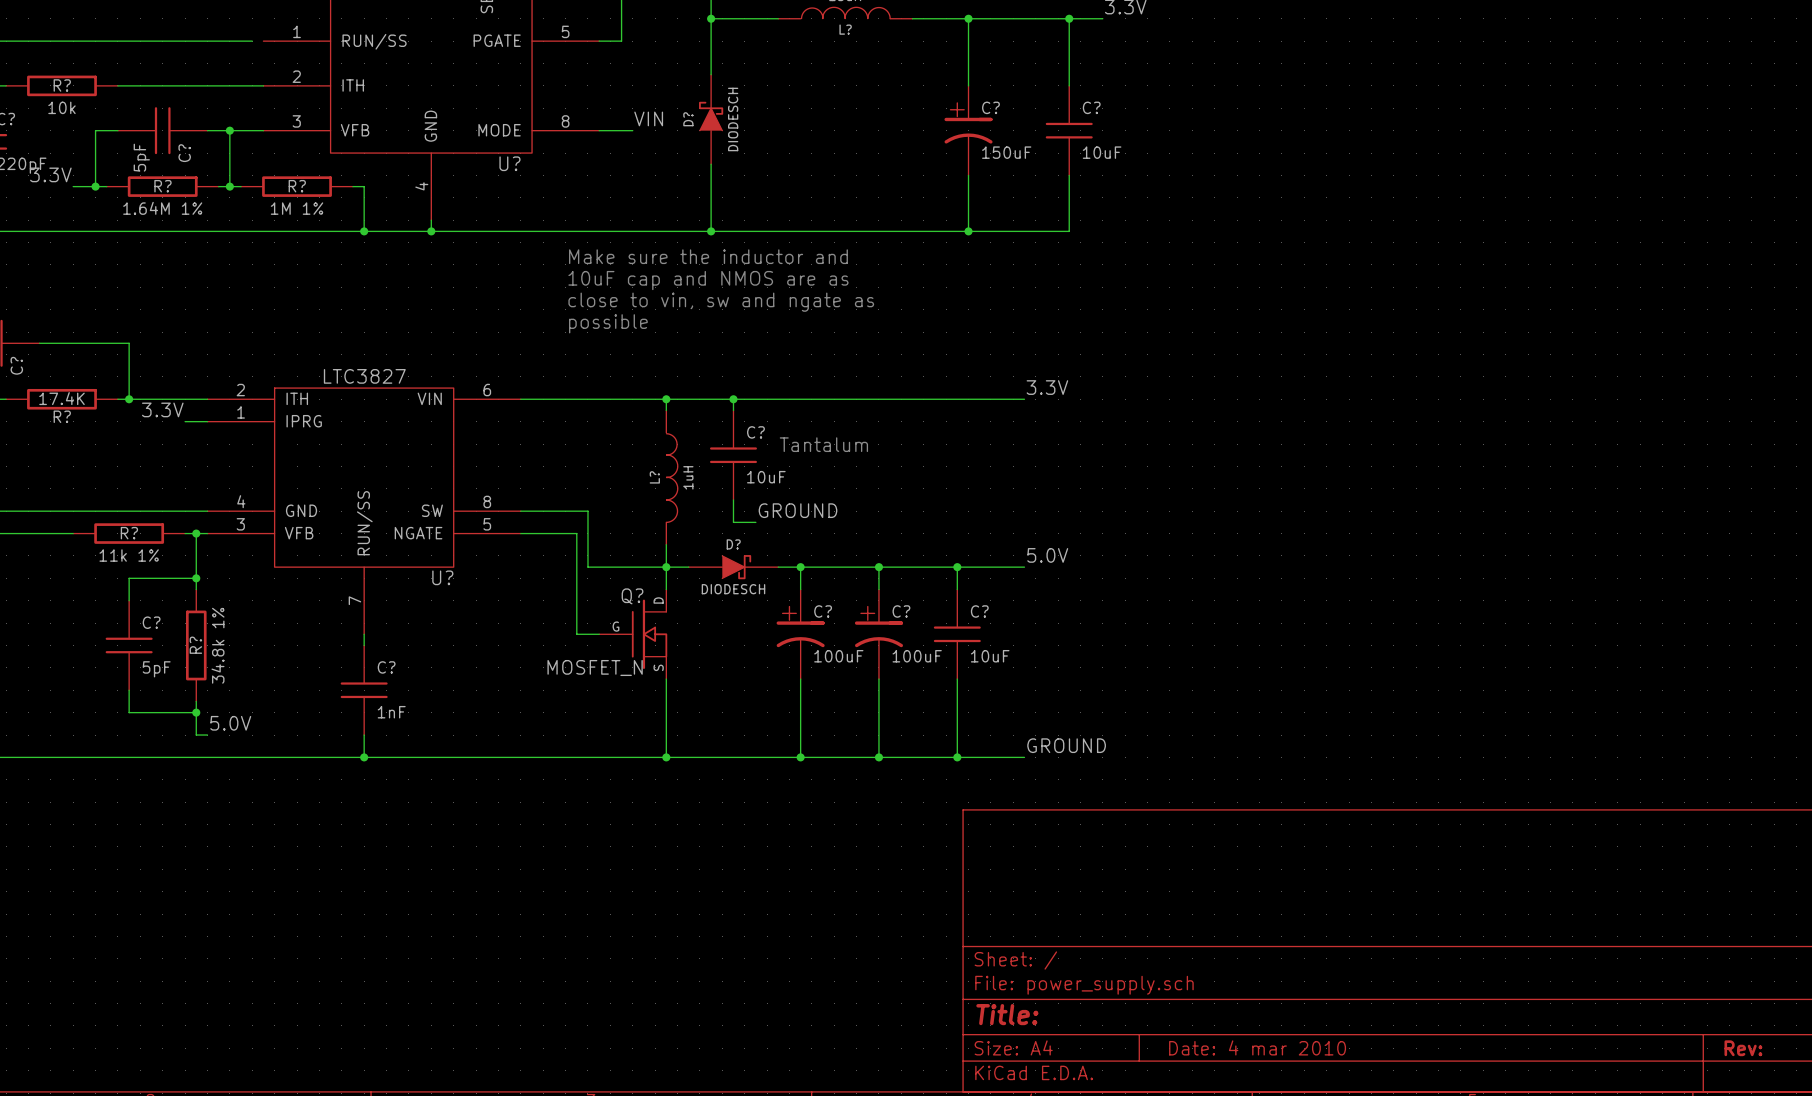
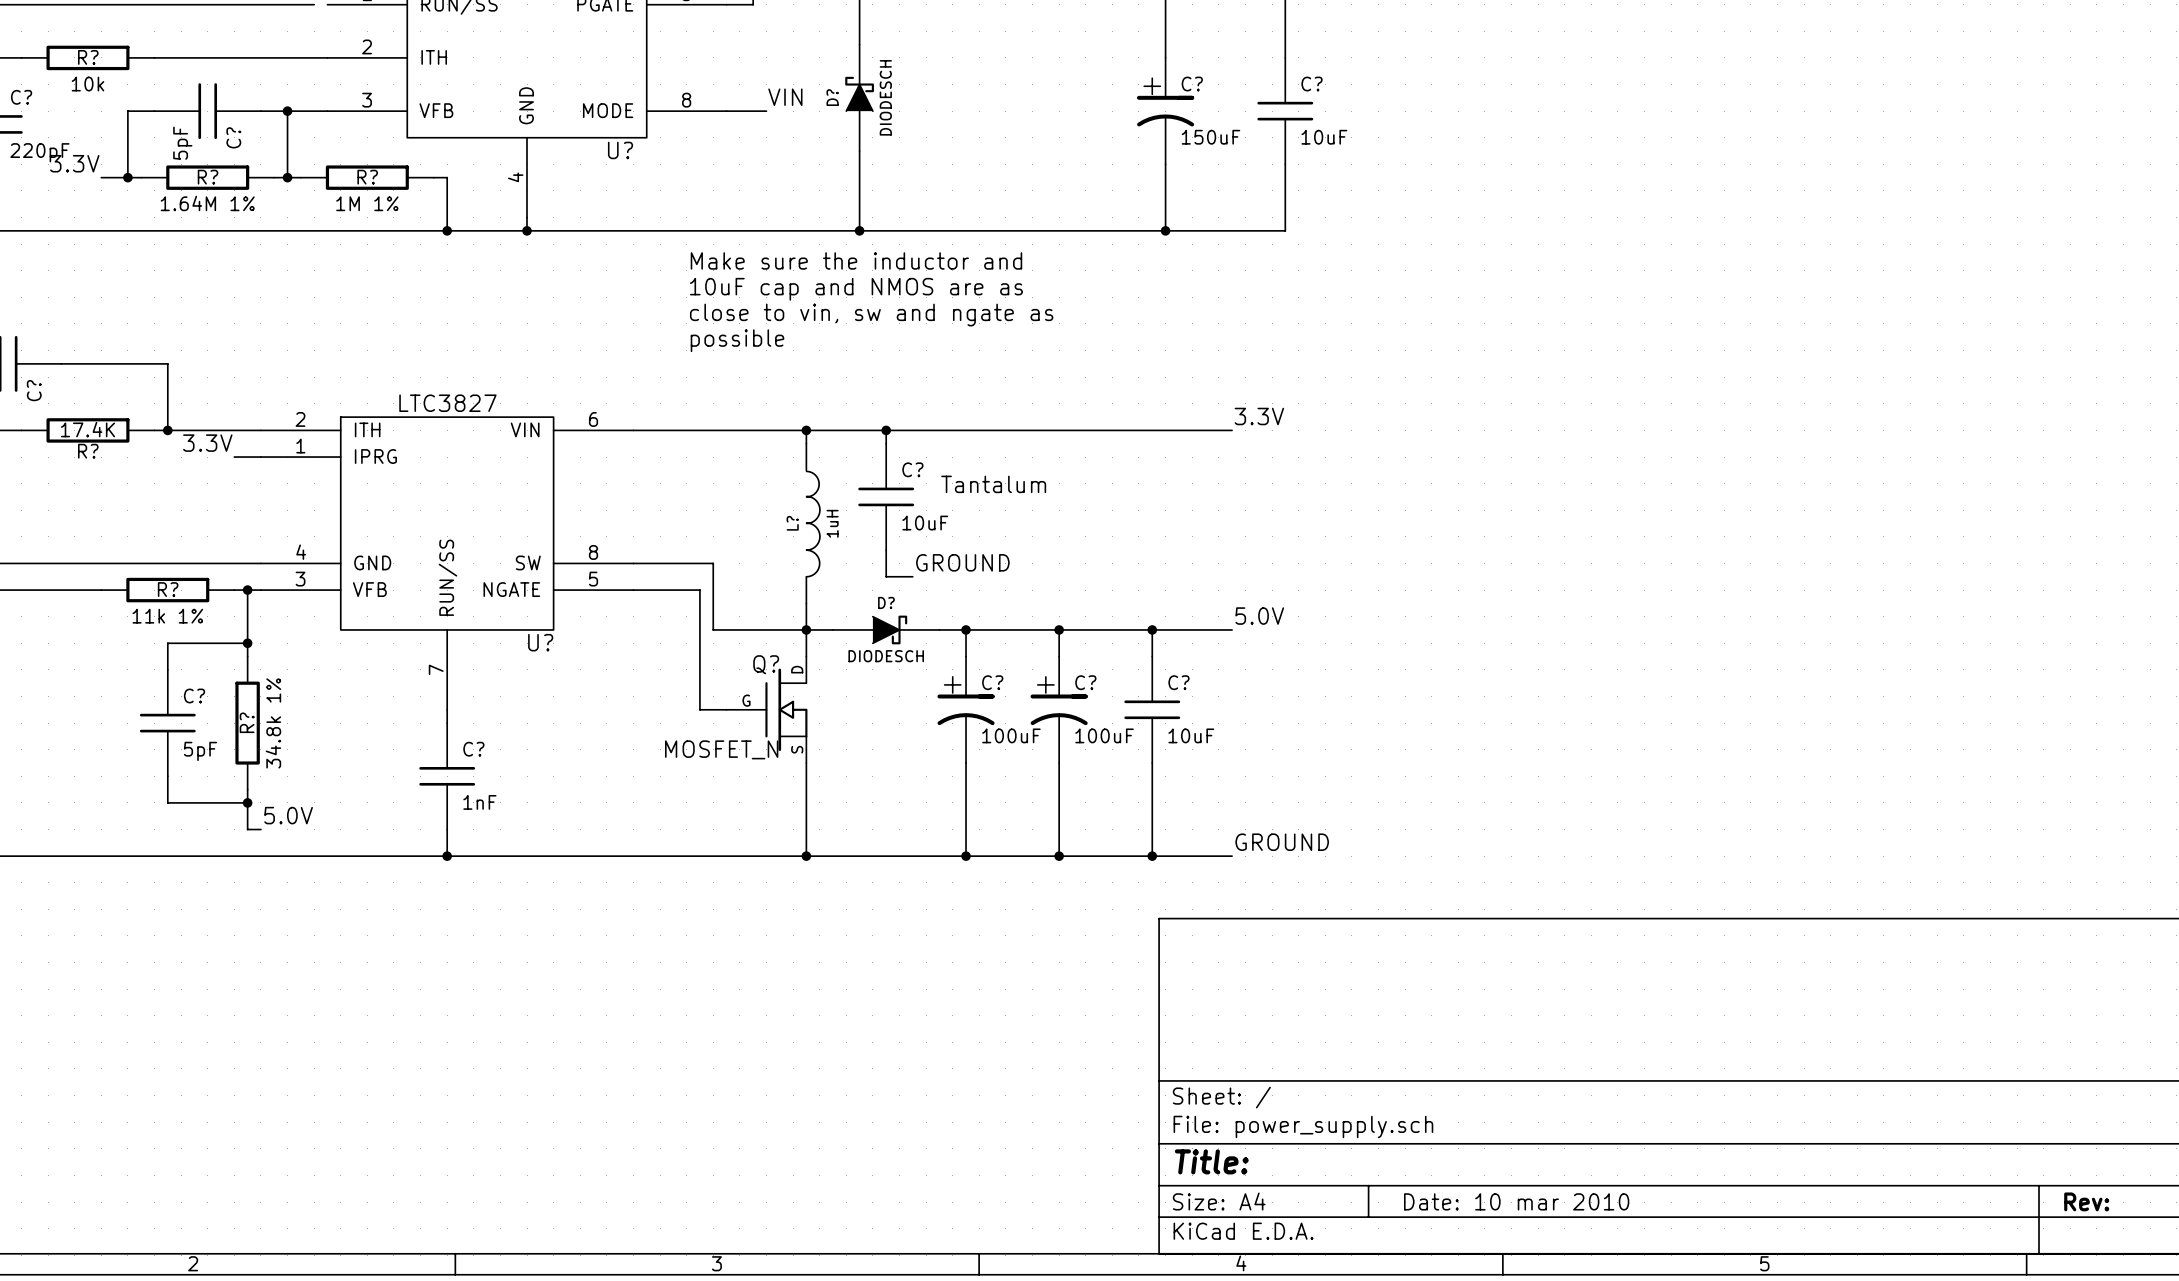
title block: Date: 4 mar 2010 (1257, 1047) -> Date: 10 mar 2010 (1516, 1201)

